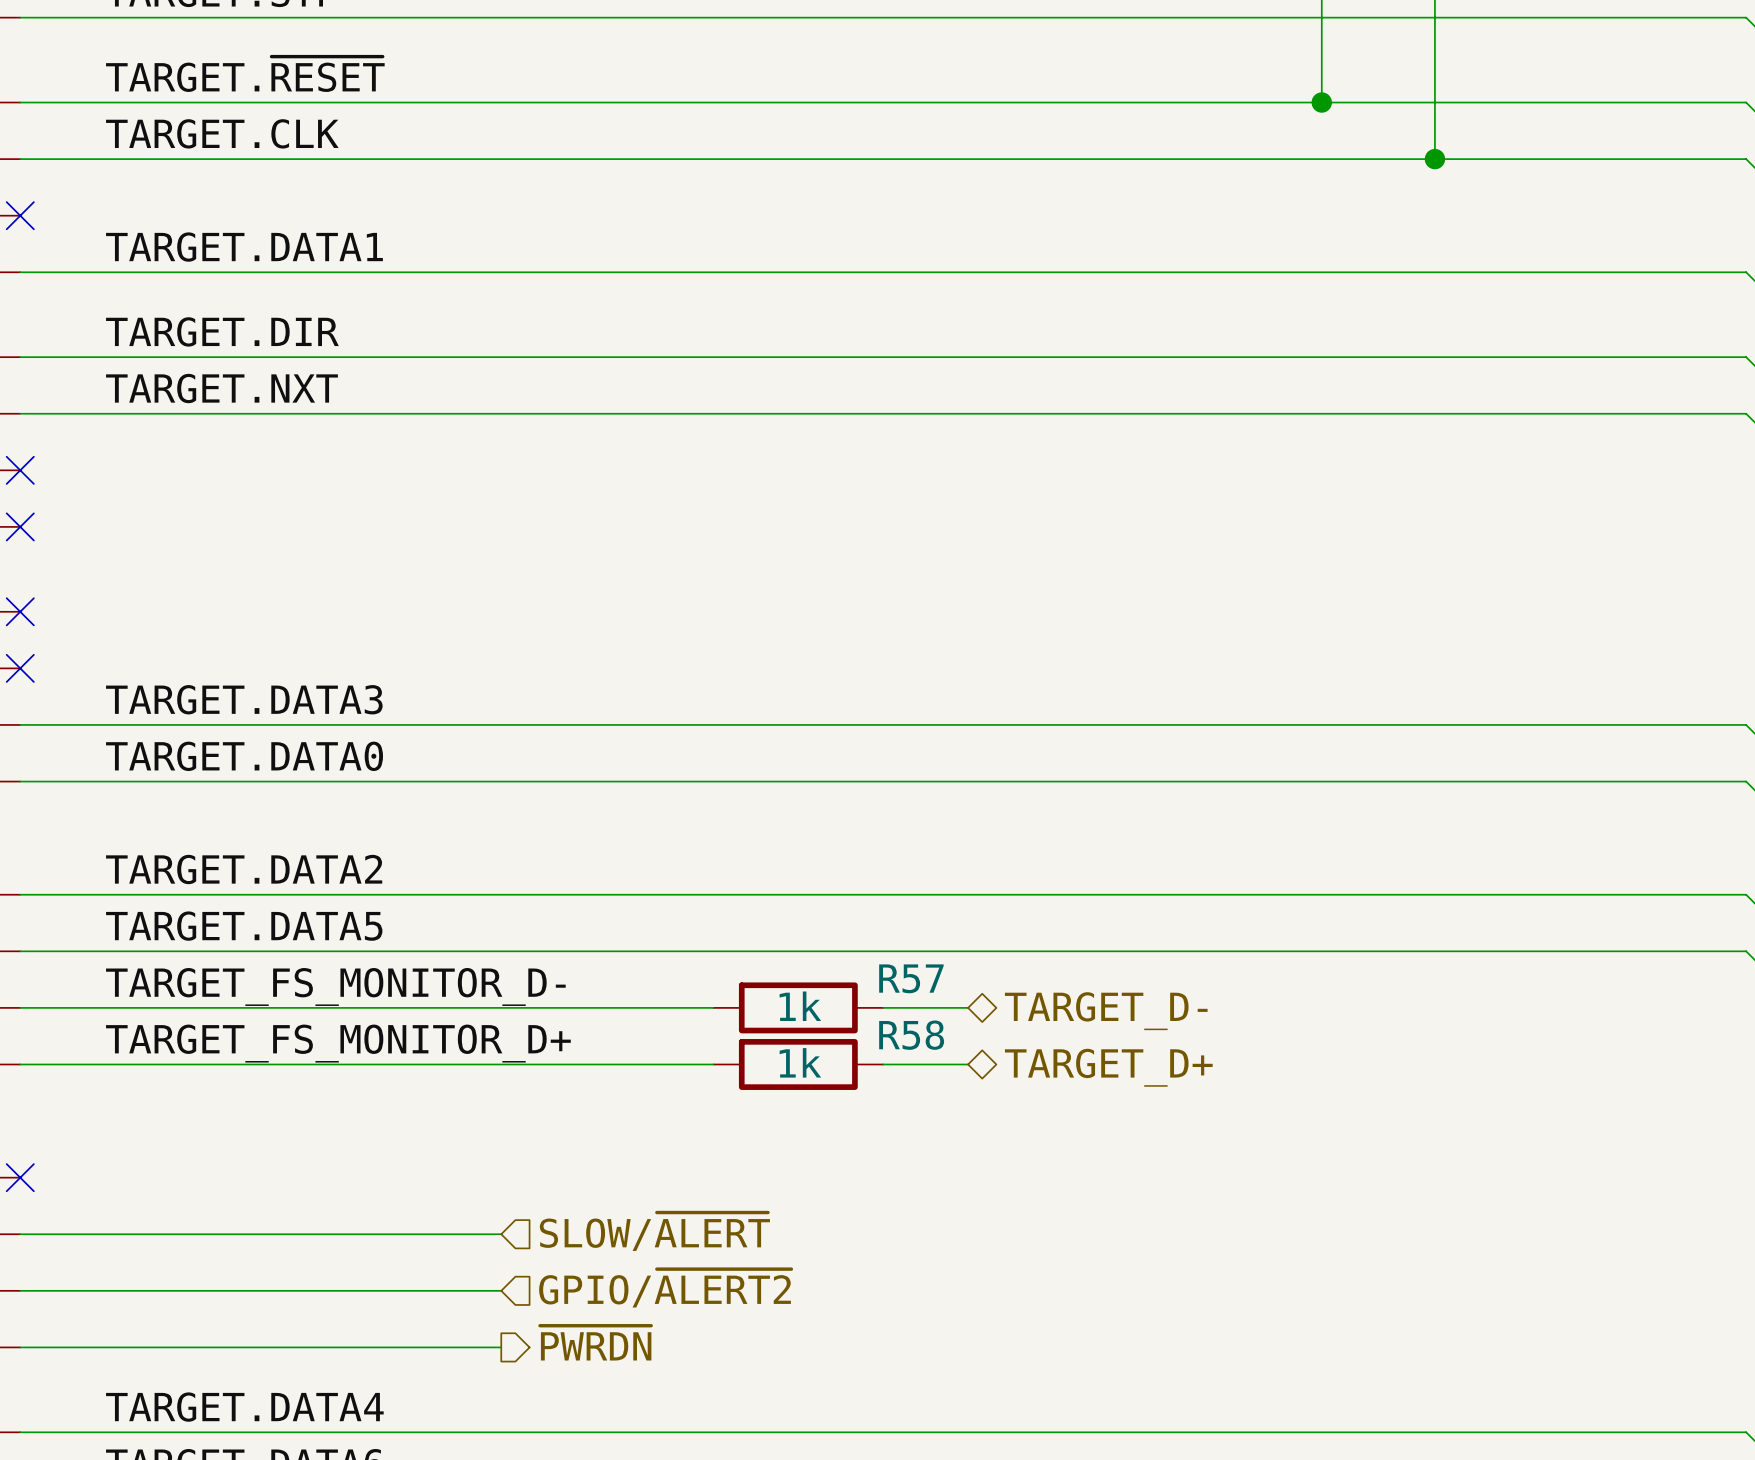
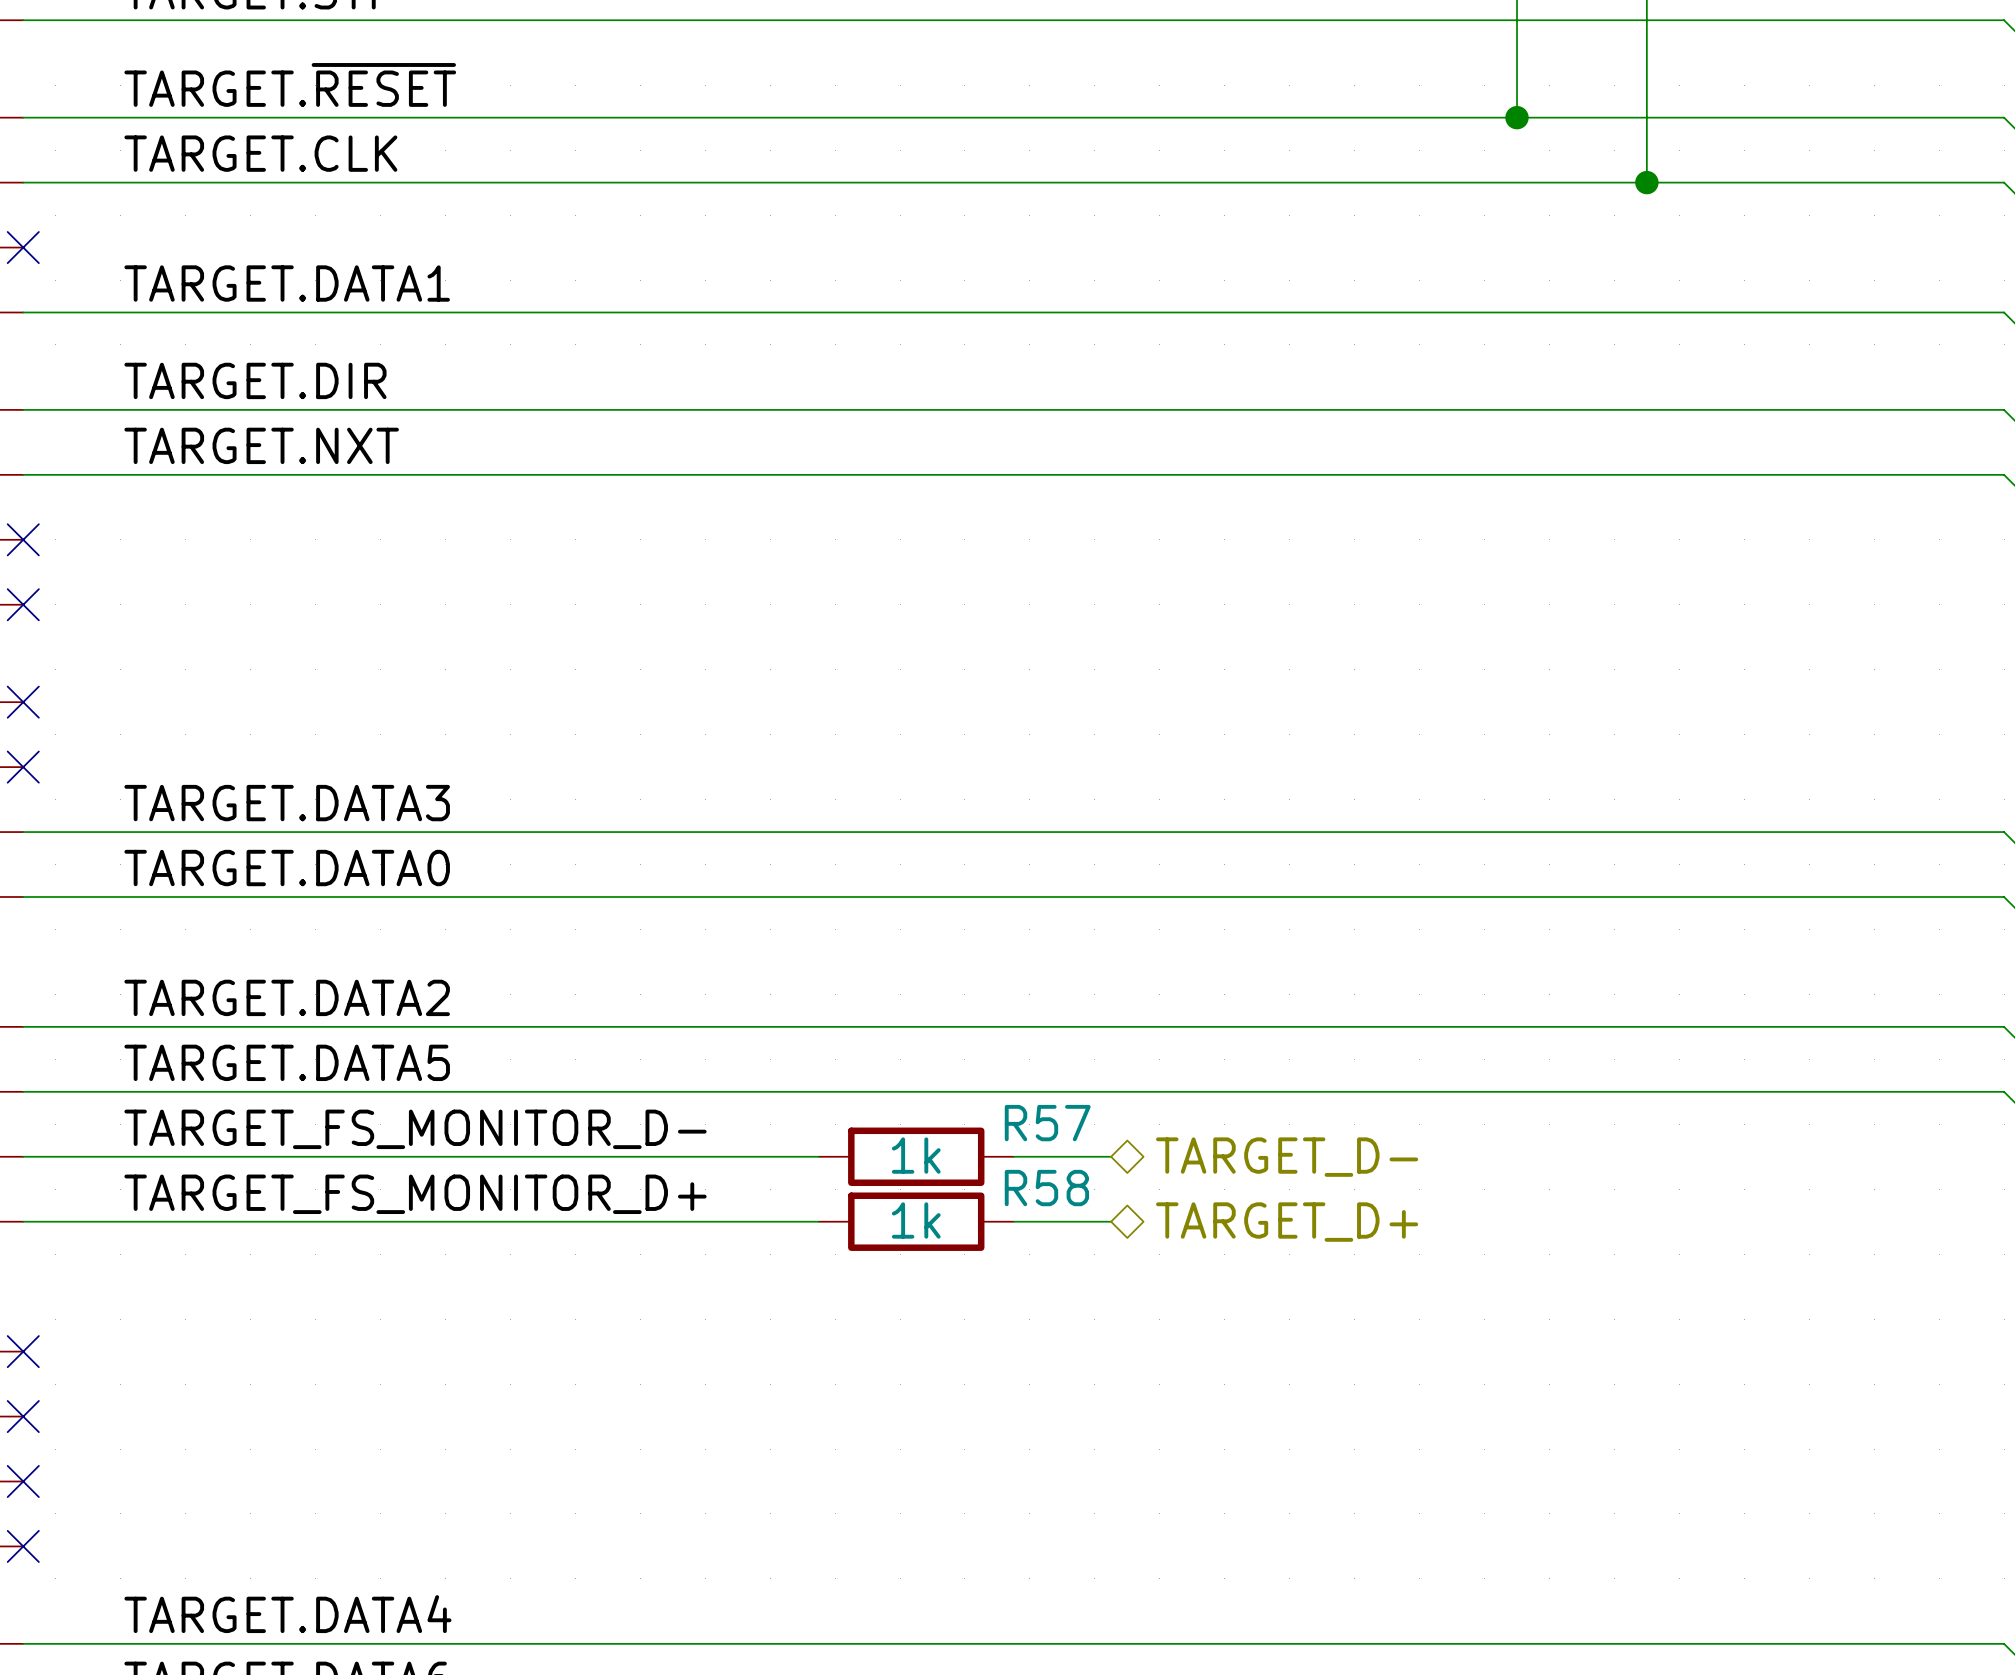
hierarchical label: SLOW/~{ALERT} (654, 1231) -> none
wire: (20, 1234) (501, 1234) -> none
no-connect mark: none -> (23, 1416)
hierarchical label: GPIO/~{ALERT2} (665, 1288) -> none
wire: (20, 1290) (501, 1290) -> none
no-connect mark: none -> (23, 1481)
hierarchical label: ~{PWRDN} (595, 1343) -> none
wire: (20, 1347) (501, 1347) -> none
no-connect mark: none -> (23, 1546)

